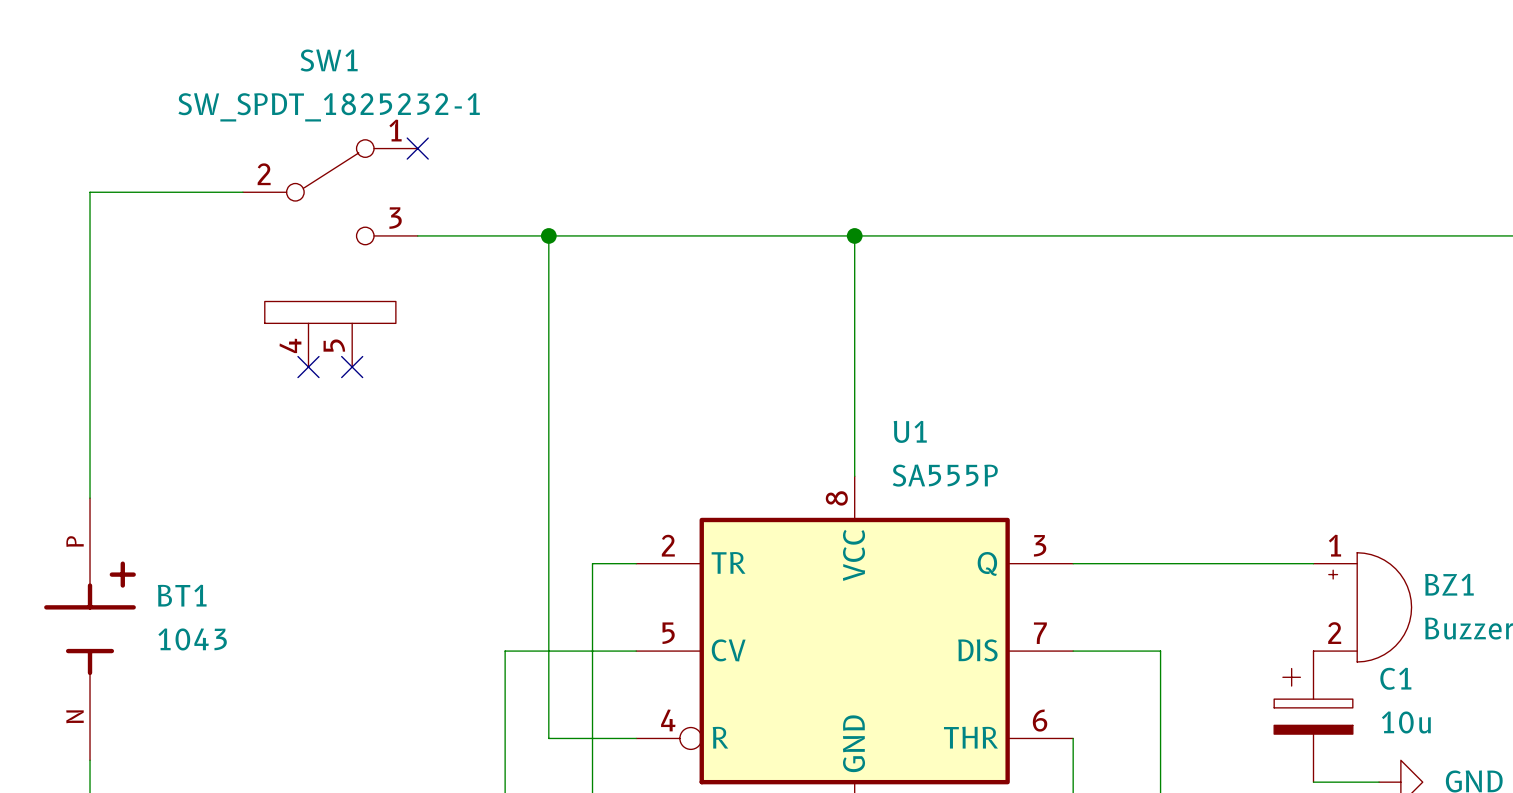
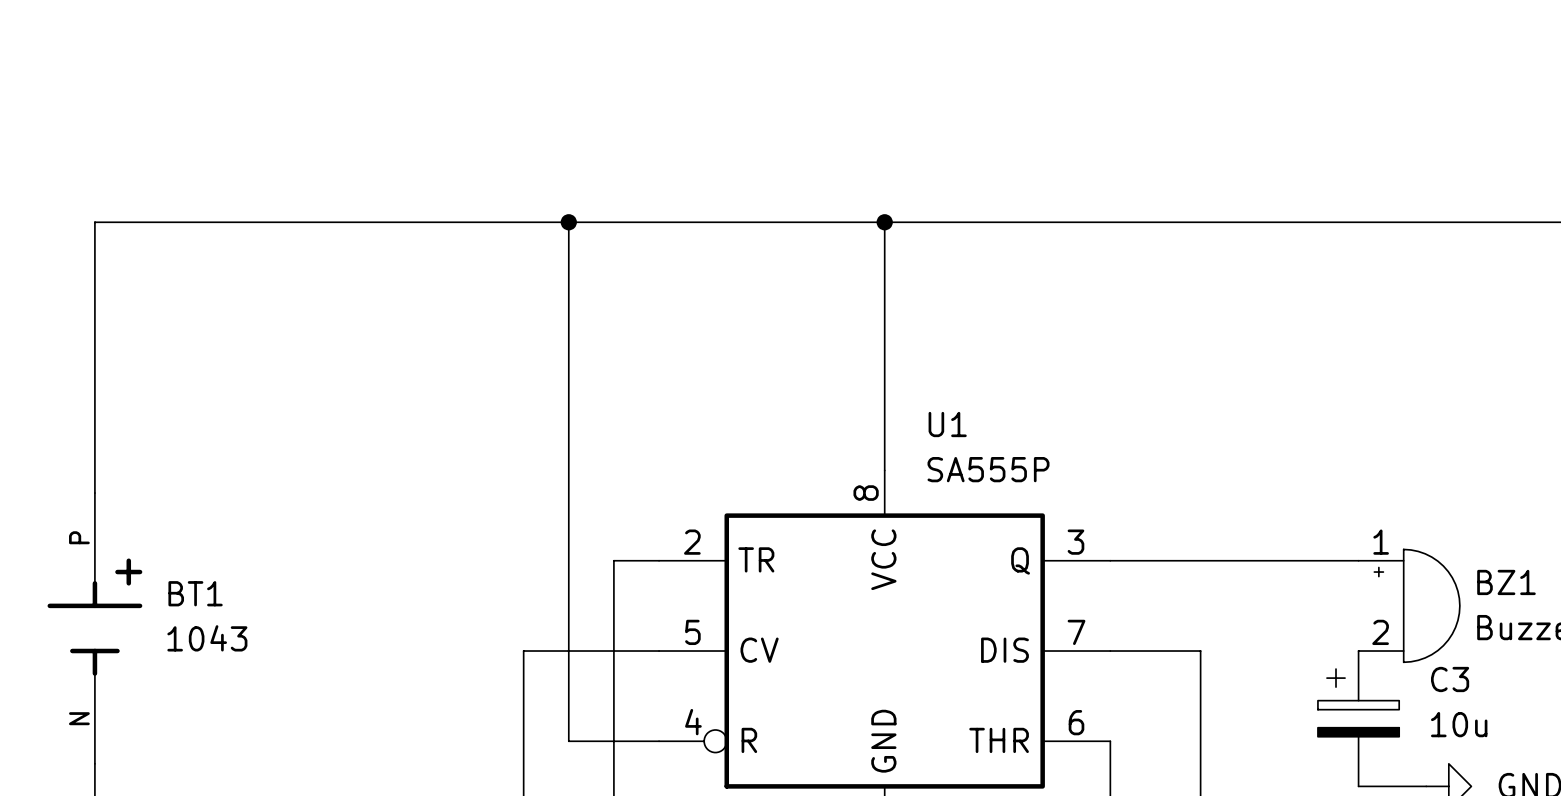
no-connect mark: (417, 148) -> none
wire: (242, 192) (90, 192) (90, 235) -> (433, 222) (94, 222)
SW1: SW_SPDT_1825232-1 (330, 253) -> none
no-connect mark: (308, 367) -> none
no-connect mark: (352, 367) -> none
C1 name: C1 (1395, 678) -> C3 (1450, 679)

